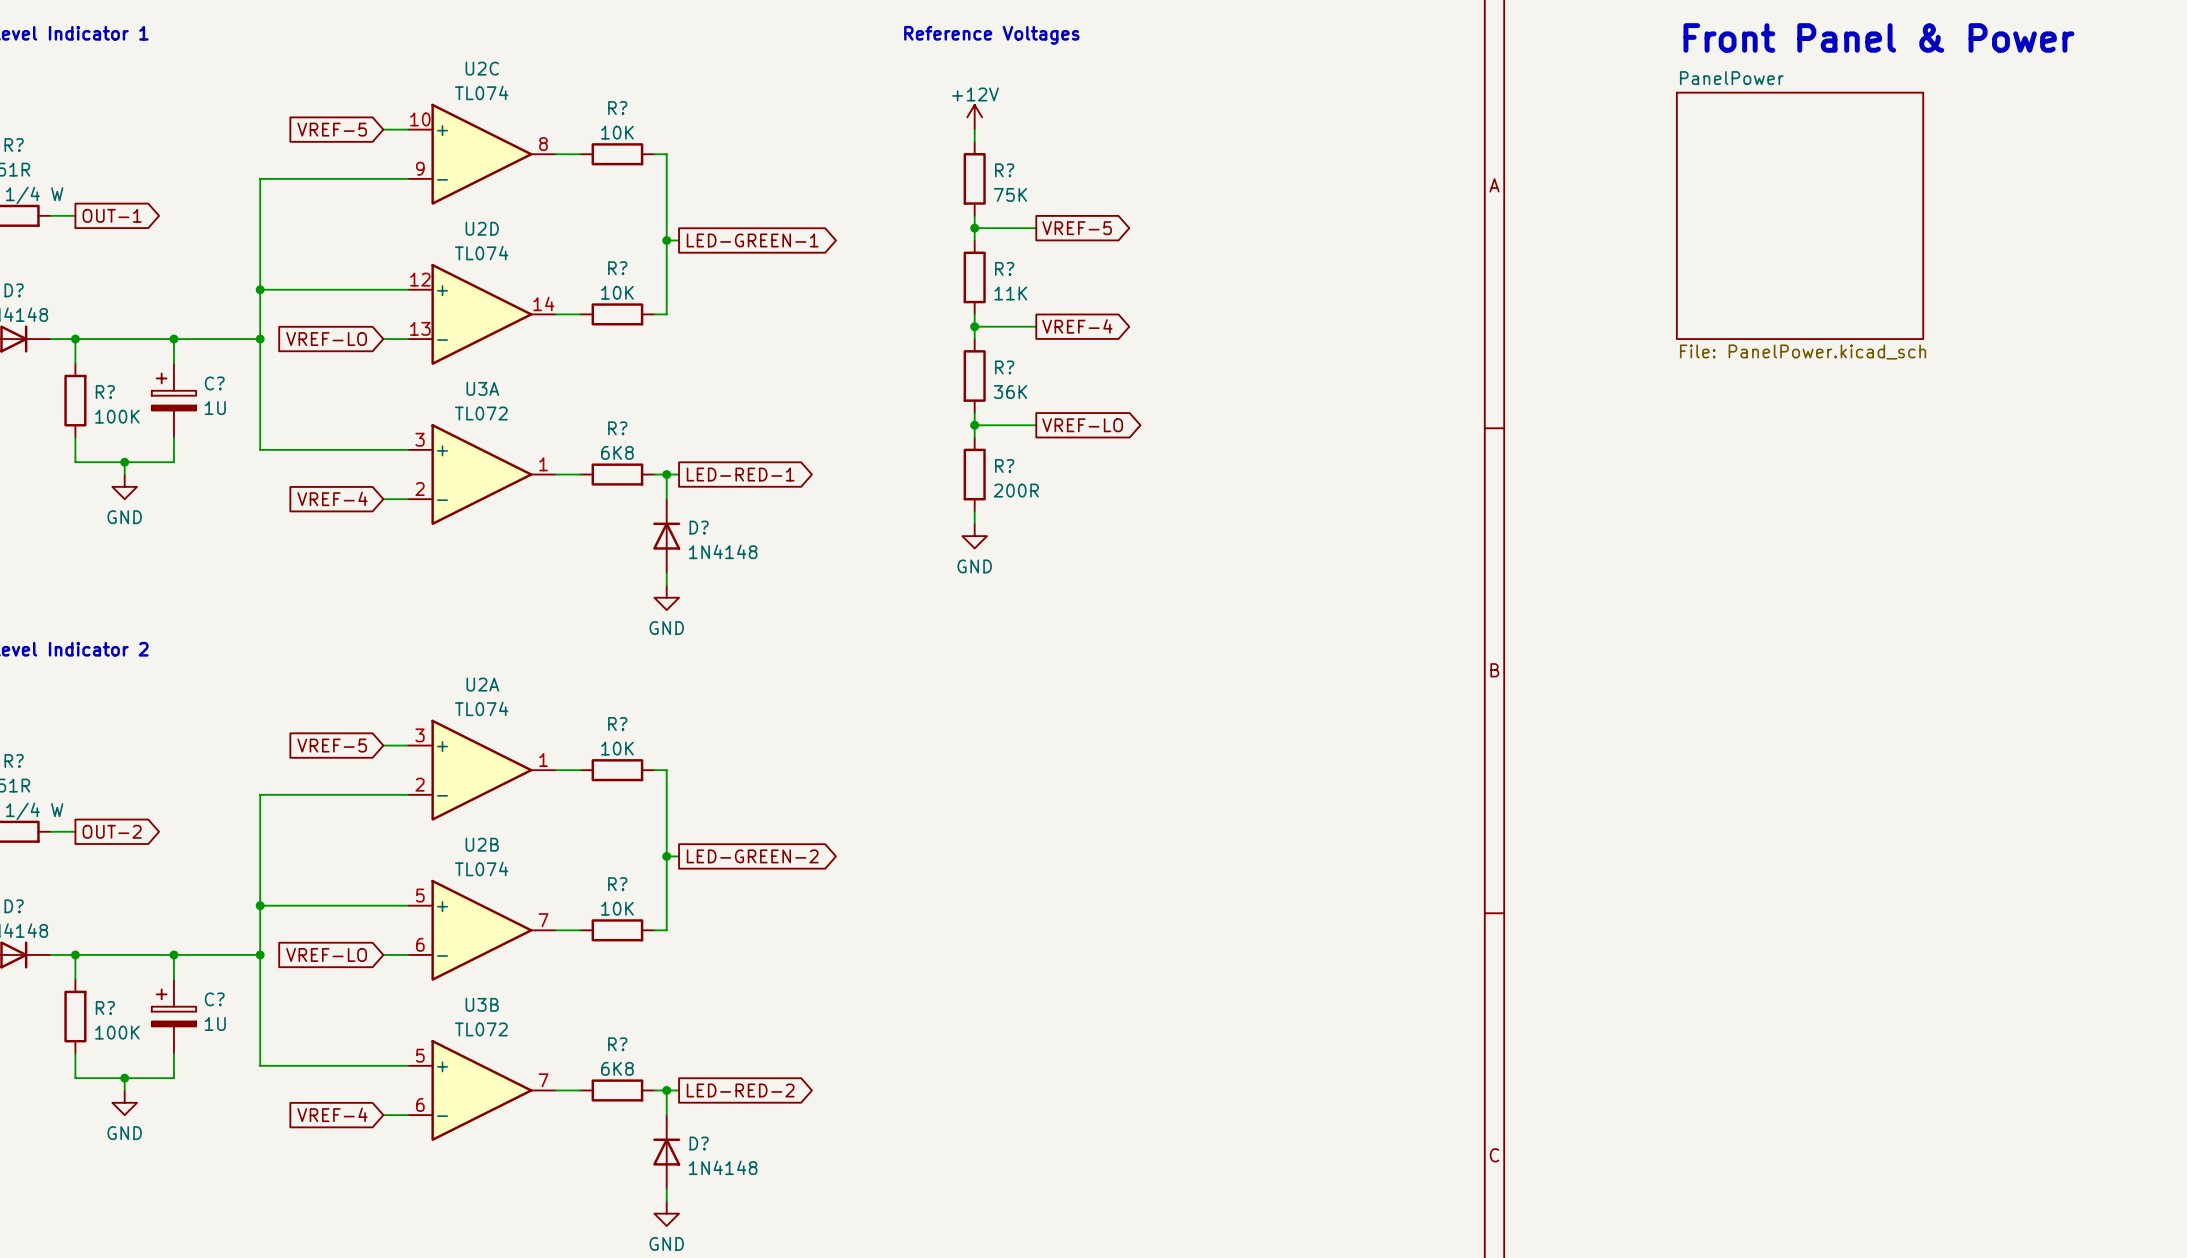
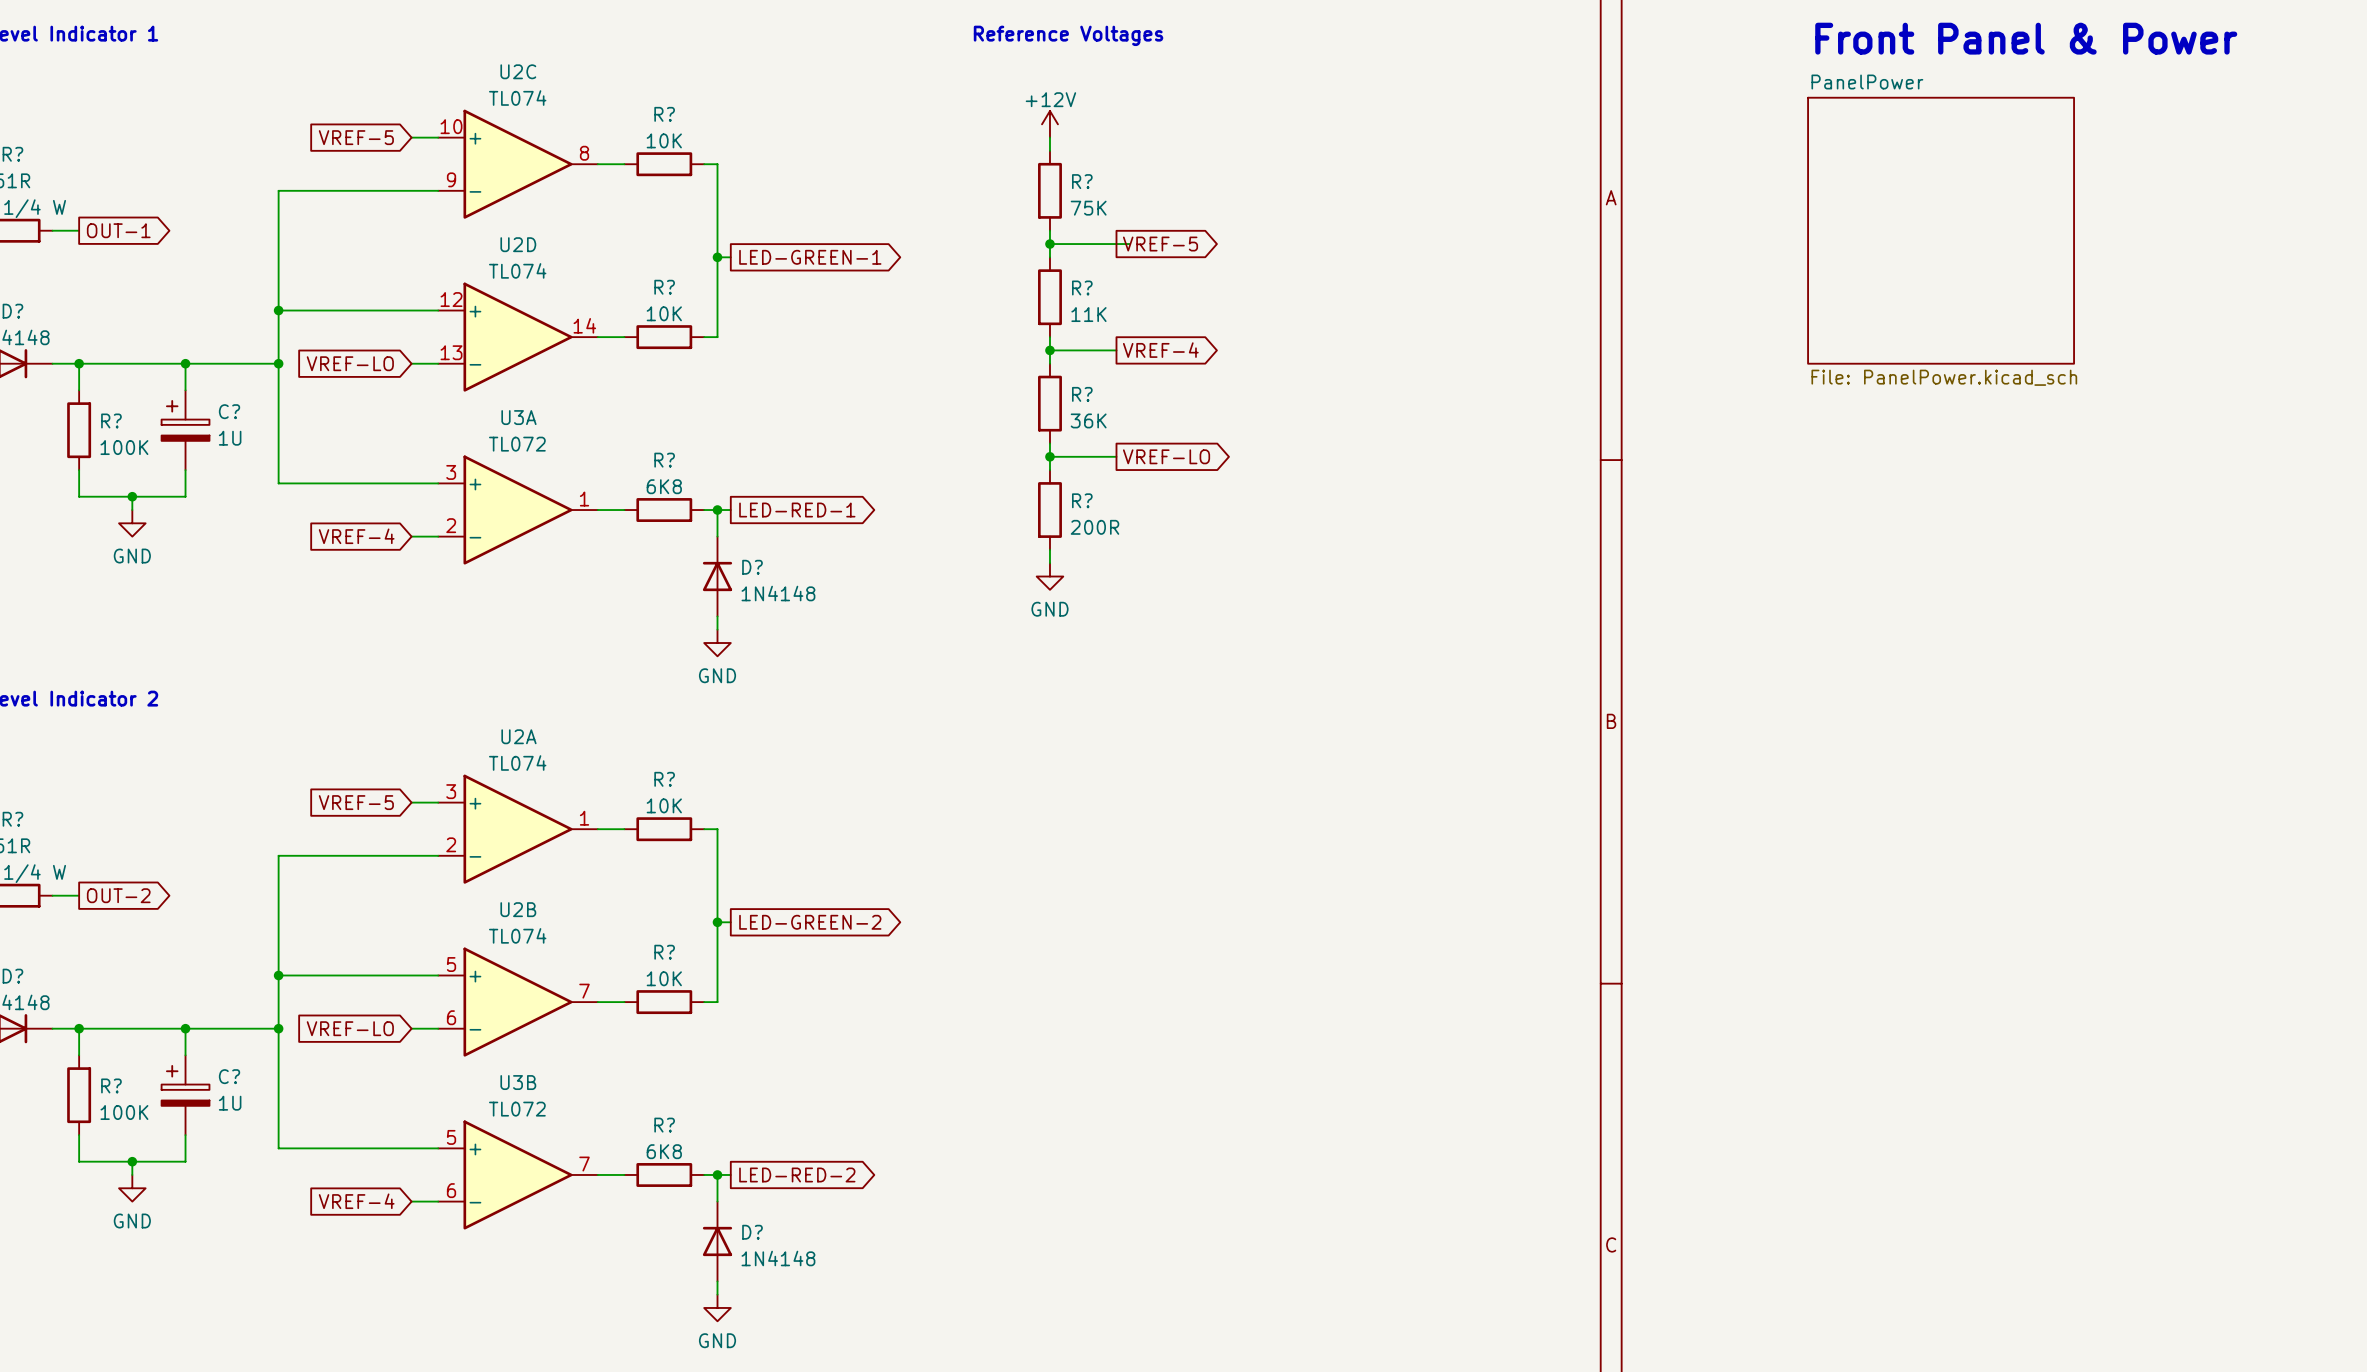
wire: none -> (1116, 244) (1129, 244)

